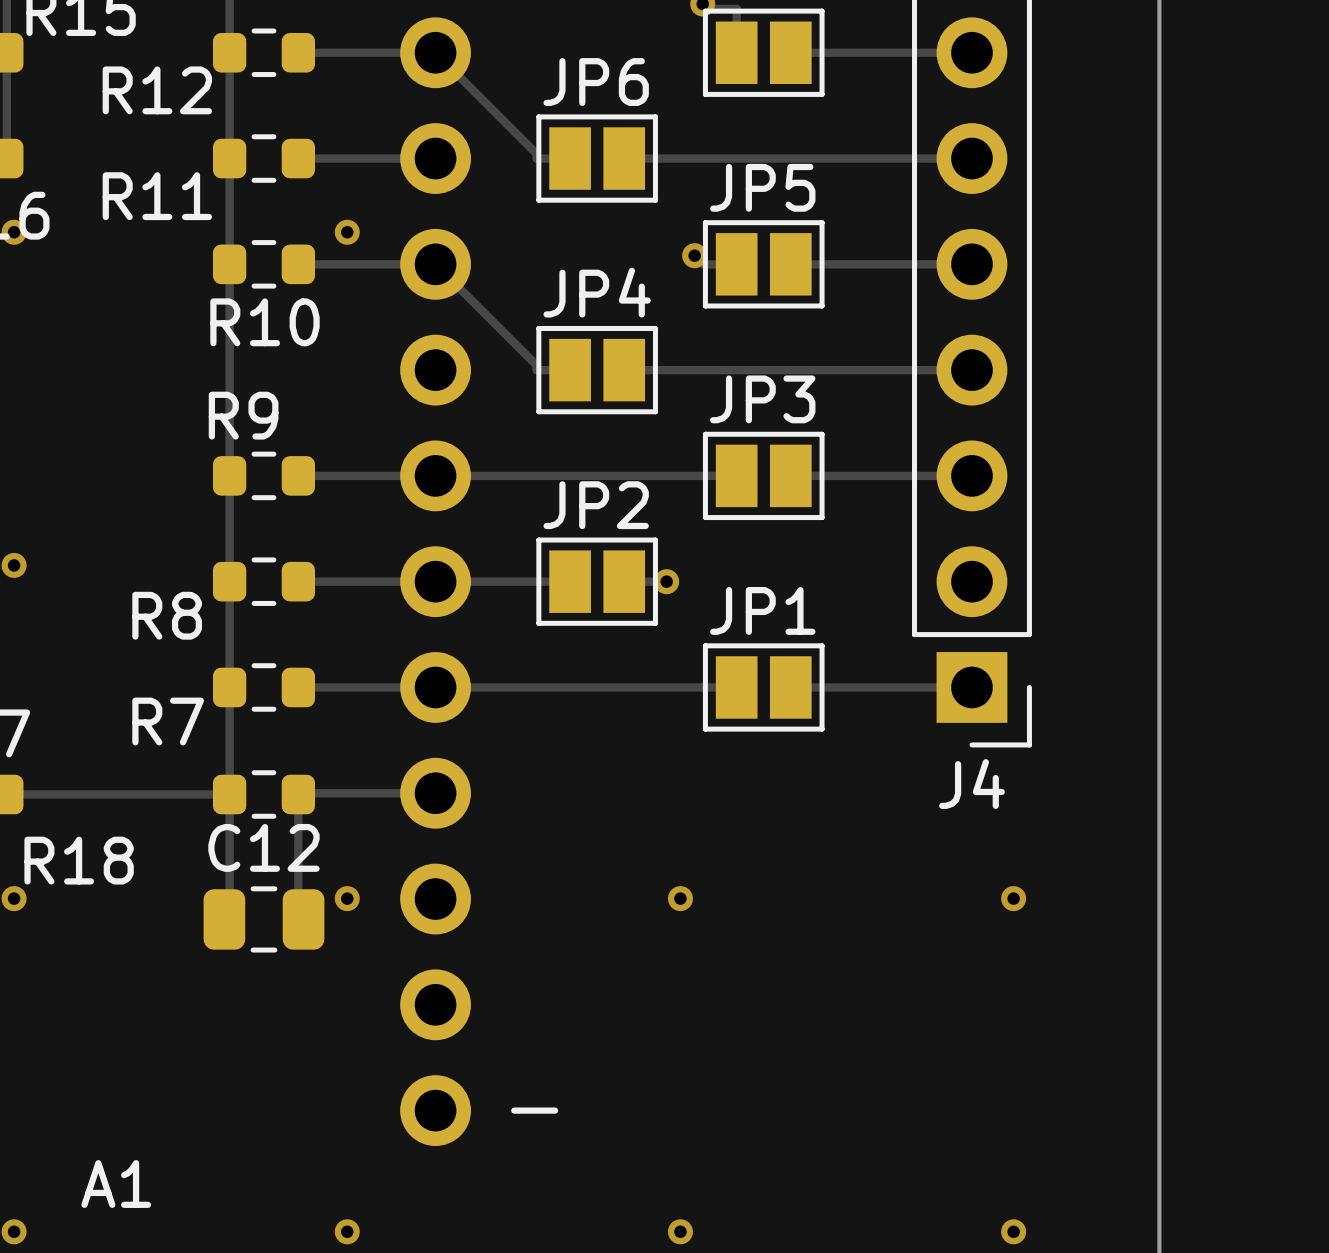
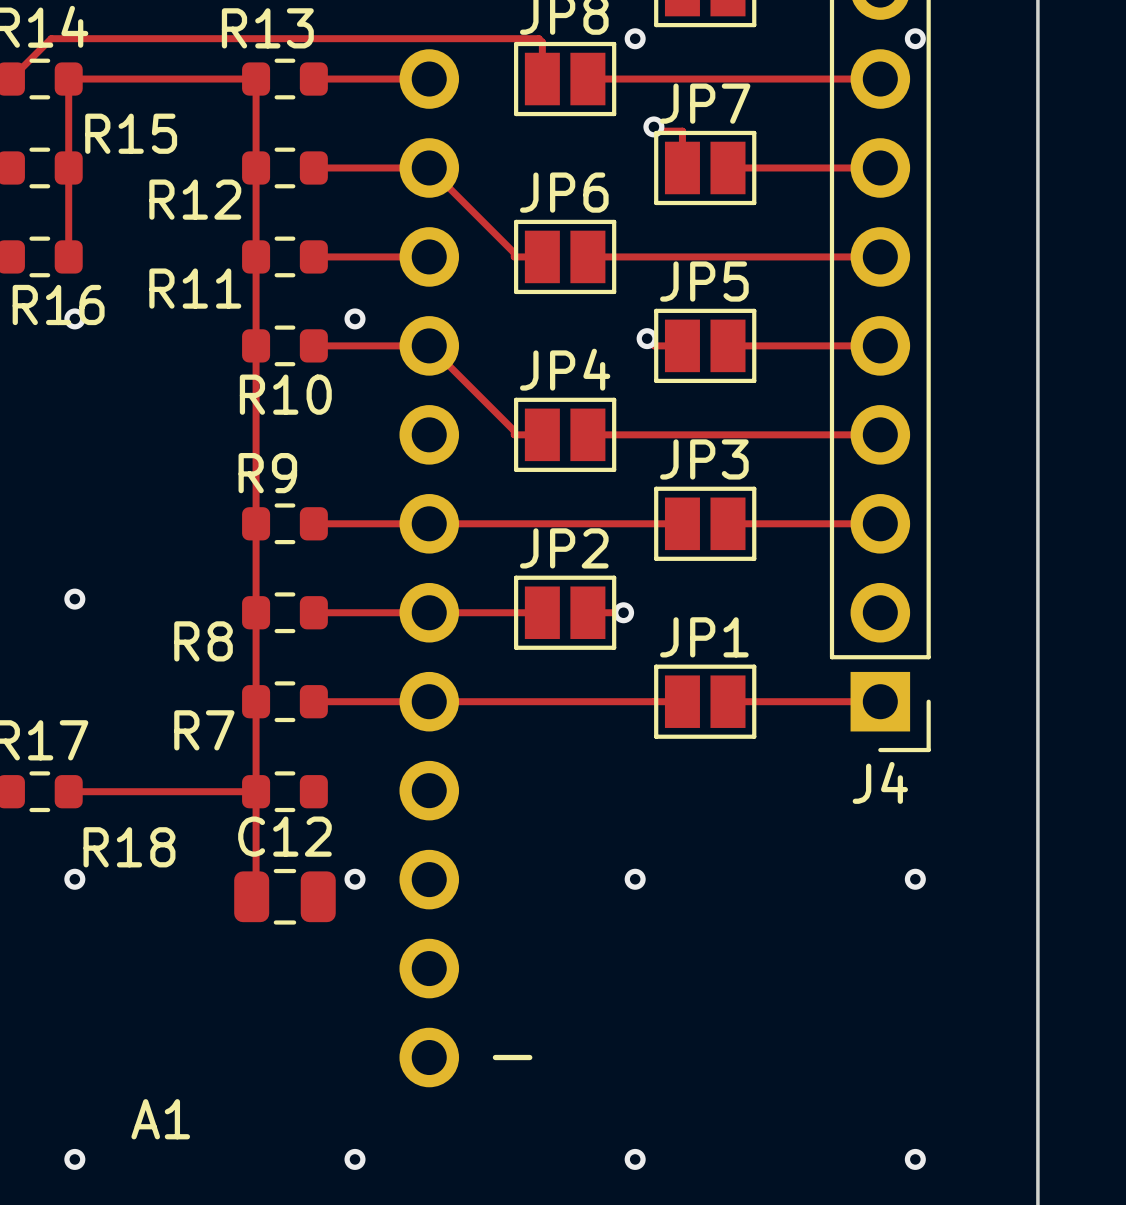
track: (435, 793) (299, 793) (298, 914) (303, 919) -> none

